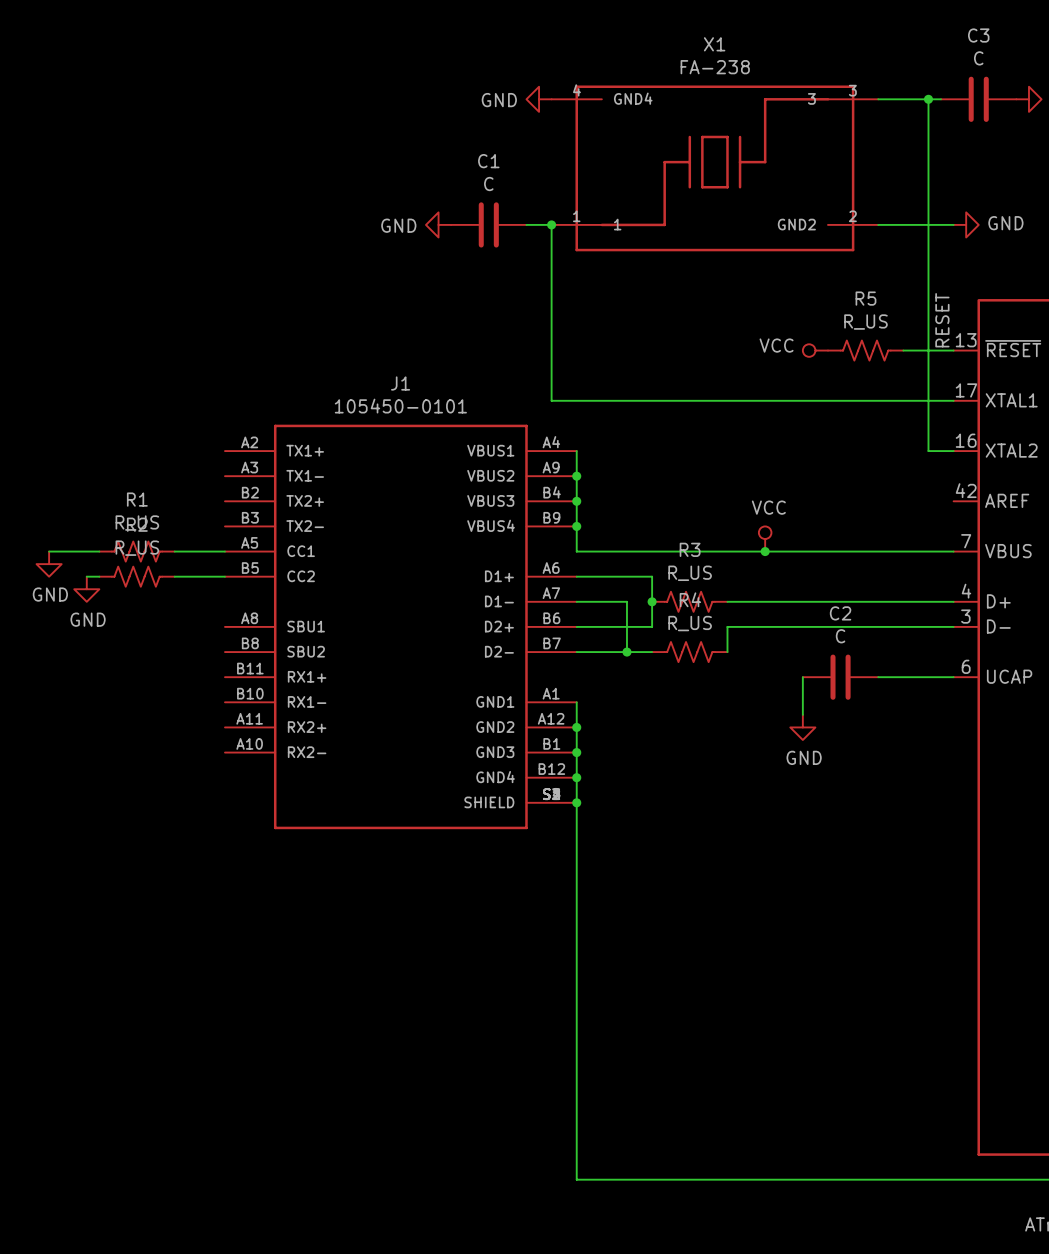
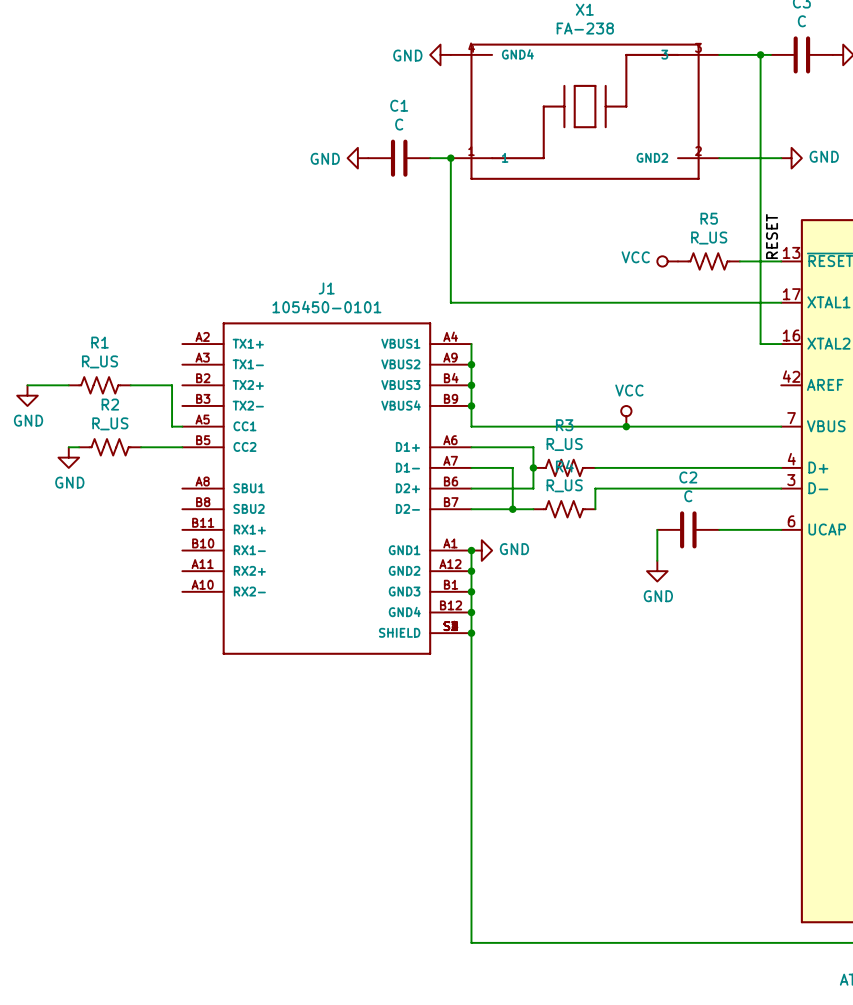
wire: (49, 551) (99, 551) -> (27, 385) (68, 385)
R1 position: (137, 551) -> (99, 385)
wire: (174, 551) (212, 551) -> (130, 385) (172, 385) (172, 426)
power symbol position: GND (49, 564) -> GND (27, 395)
junction: none -> (471, 550)
power symbol: none -> GND (481, 550)

